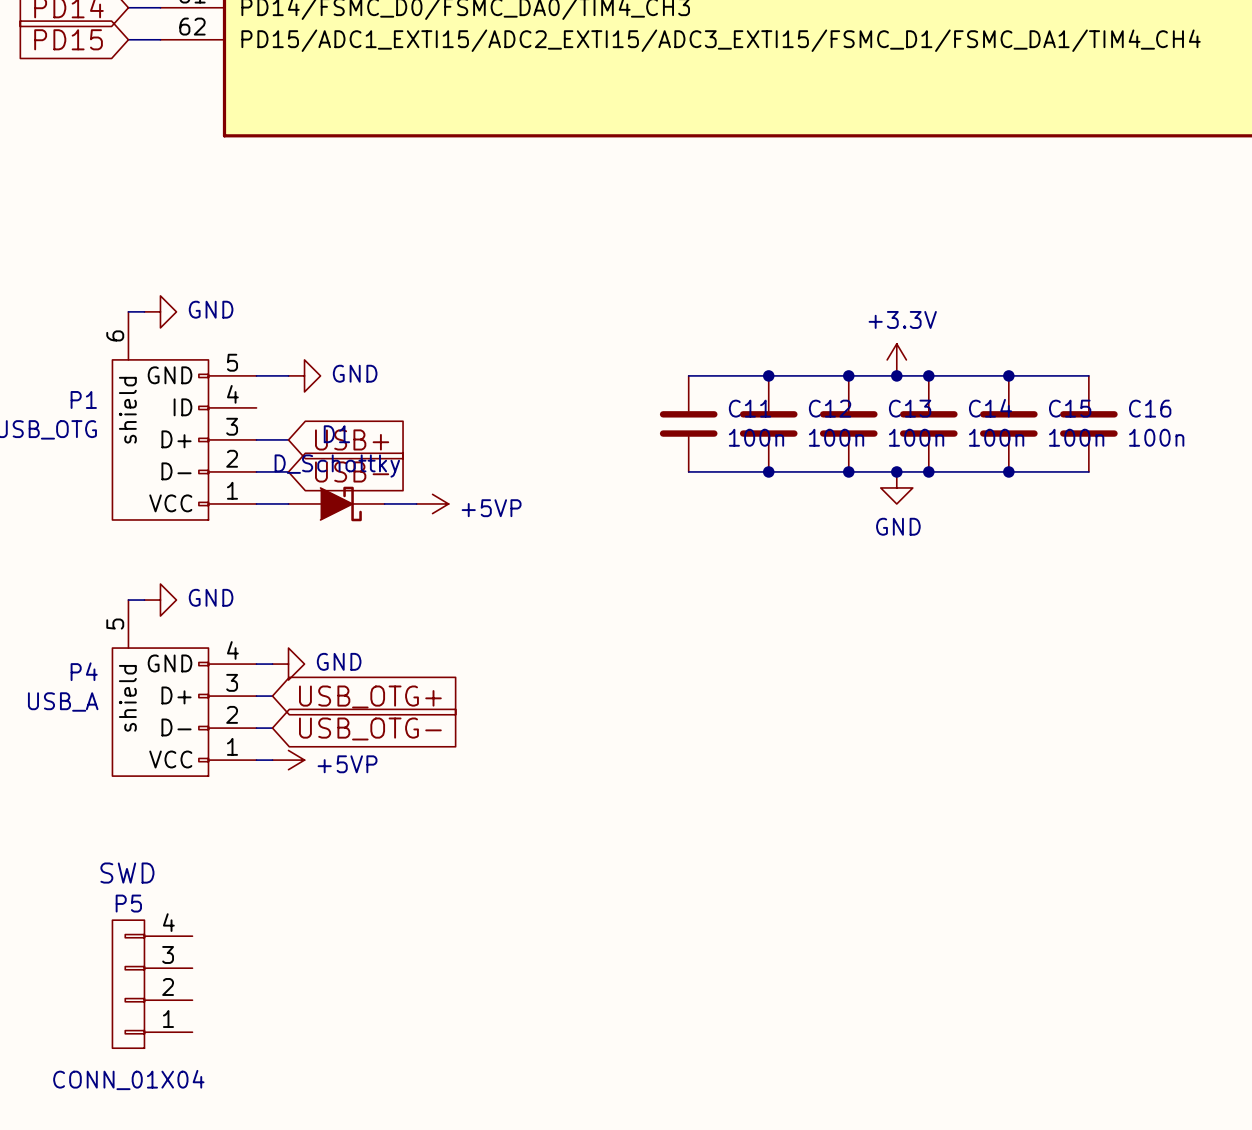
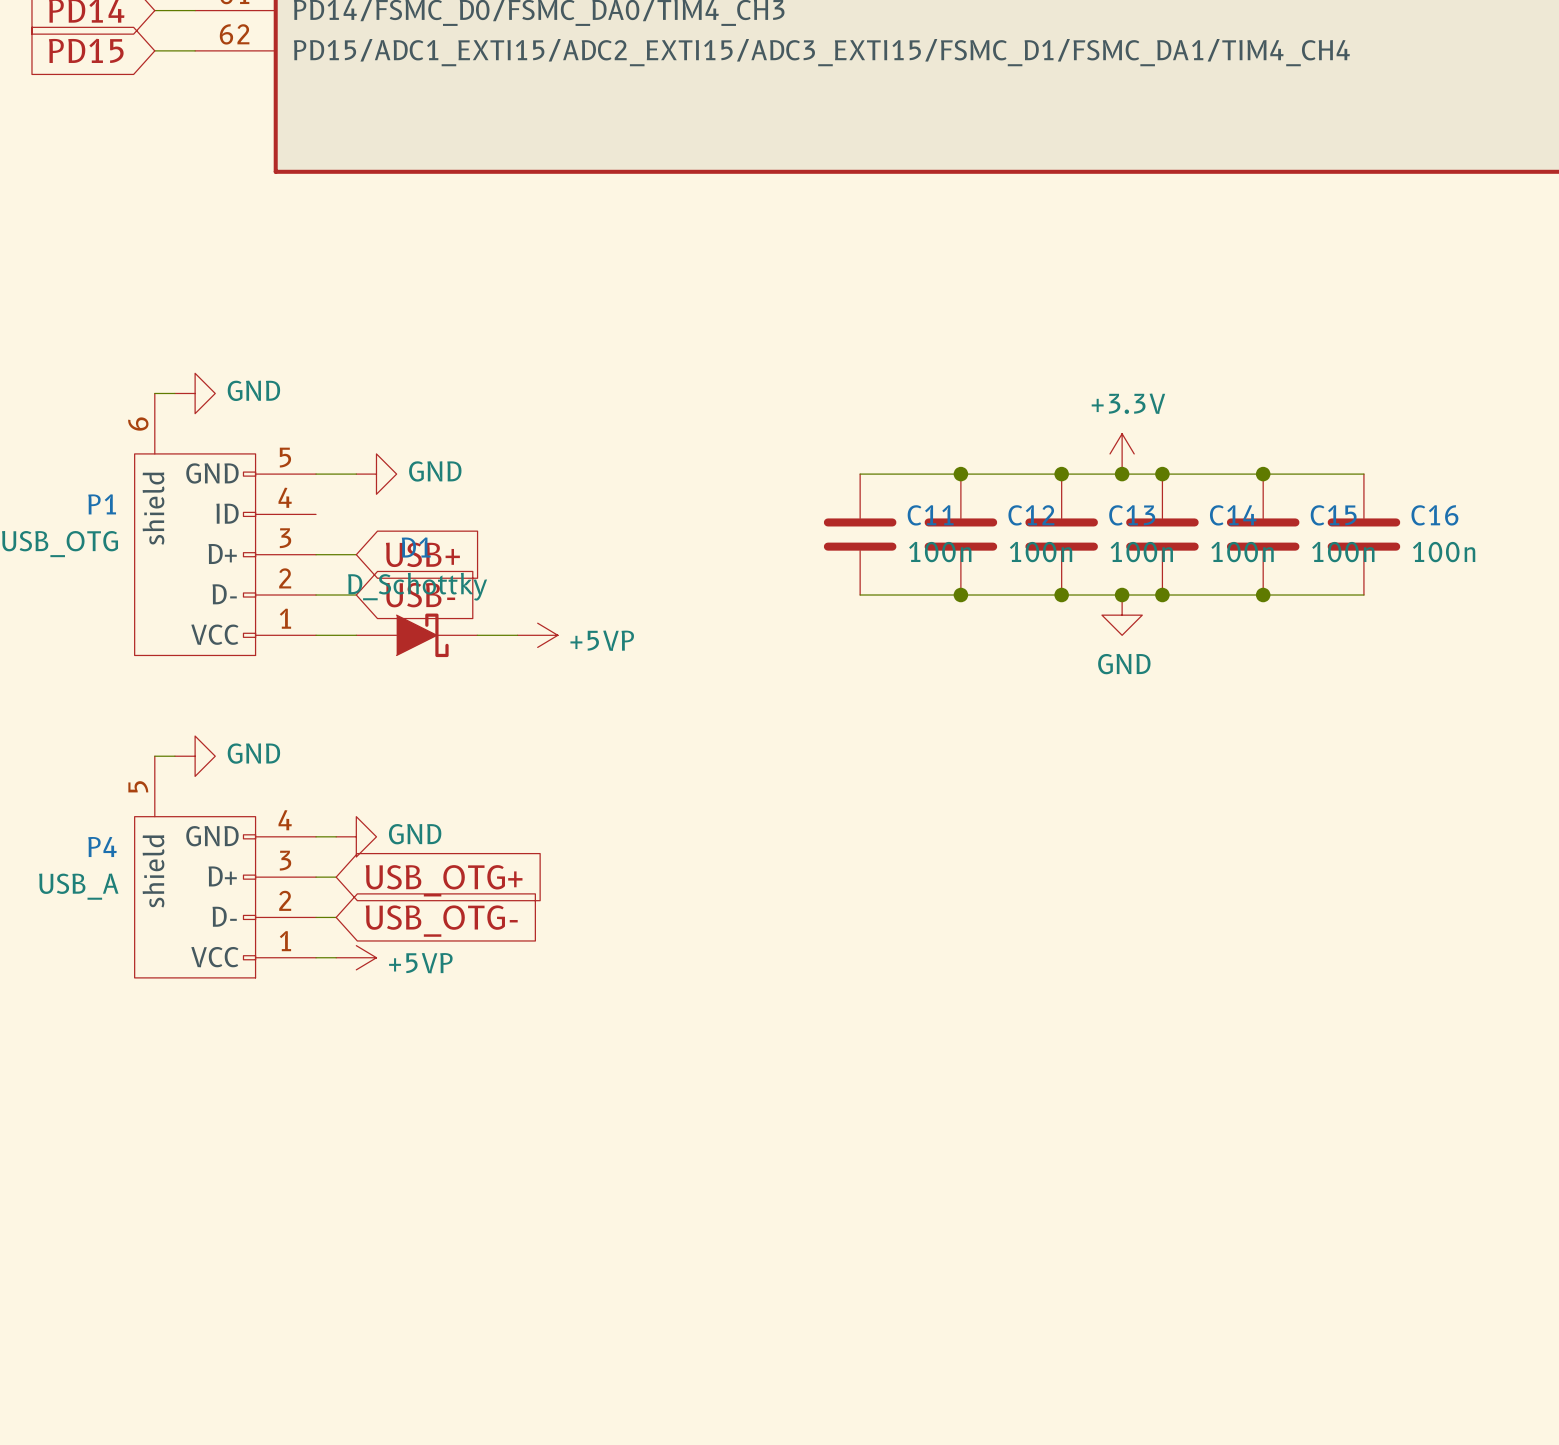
text: SWD (127, 873) -> none
P5: CONN_01X04 (152, 984) -> none

